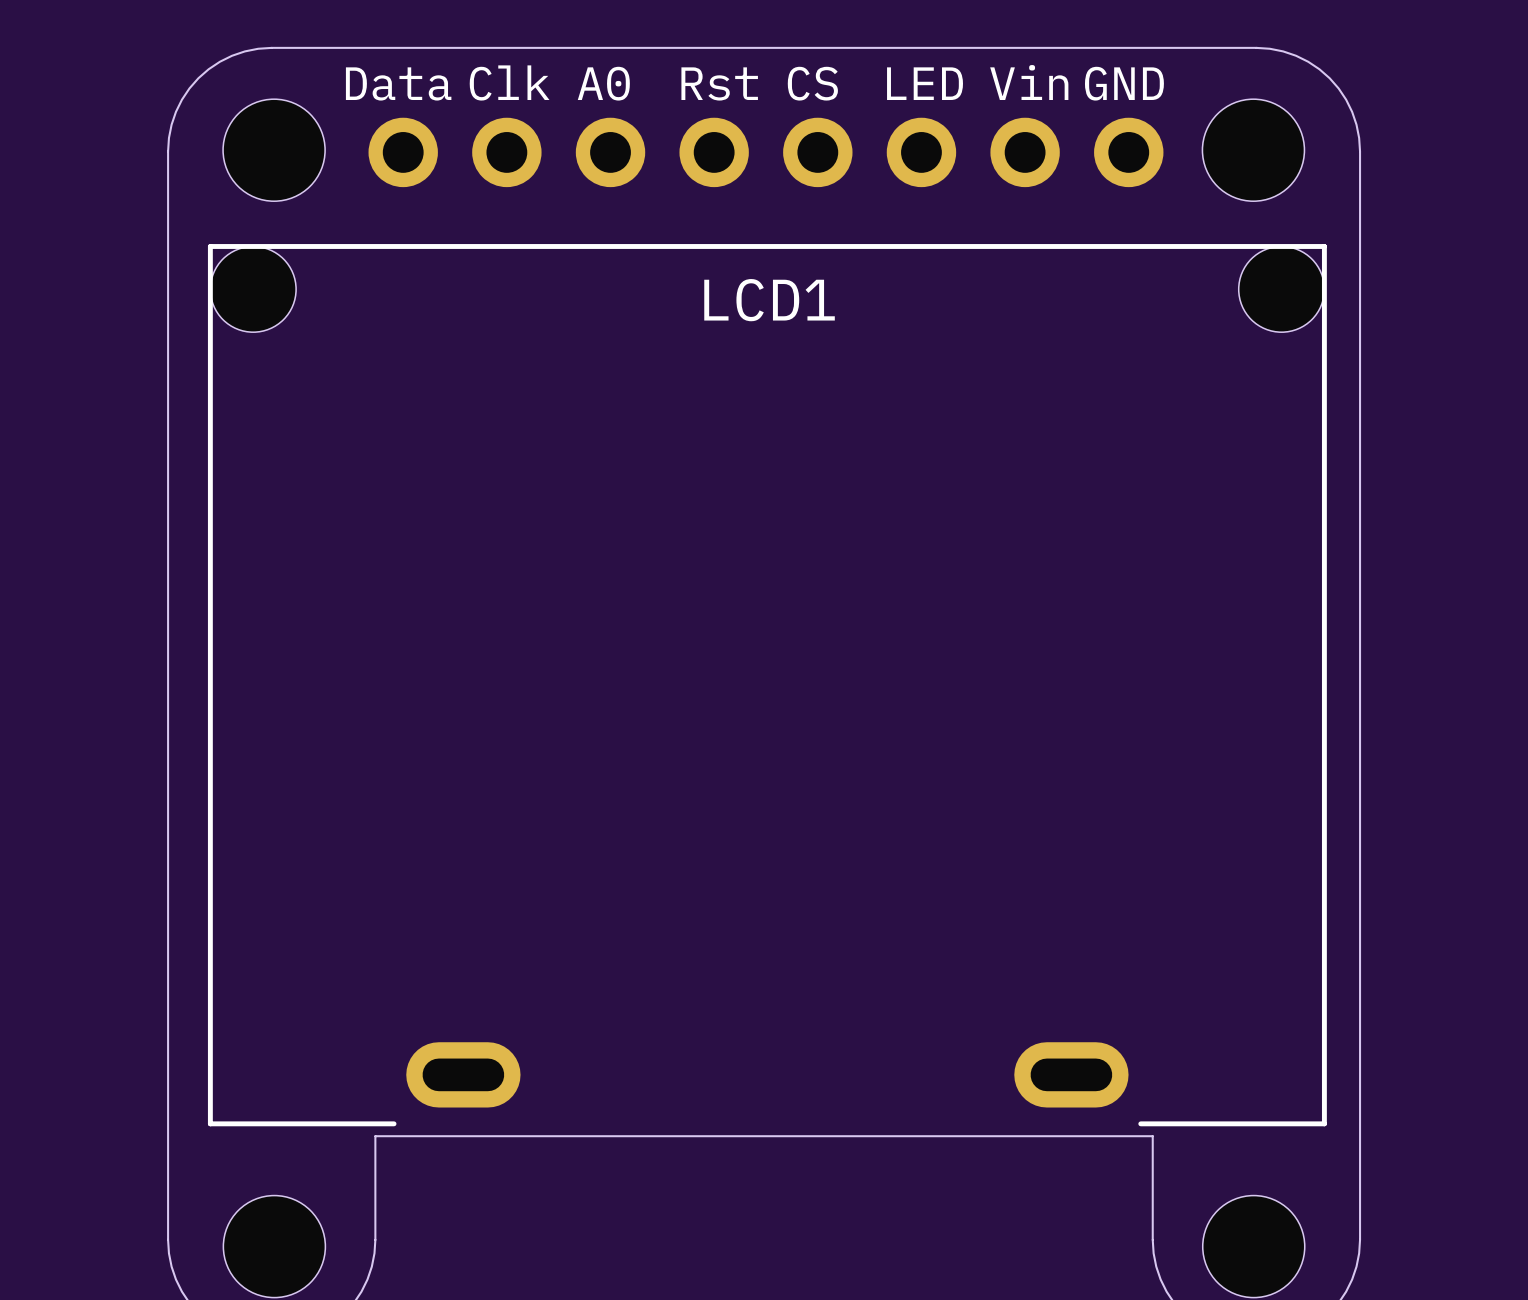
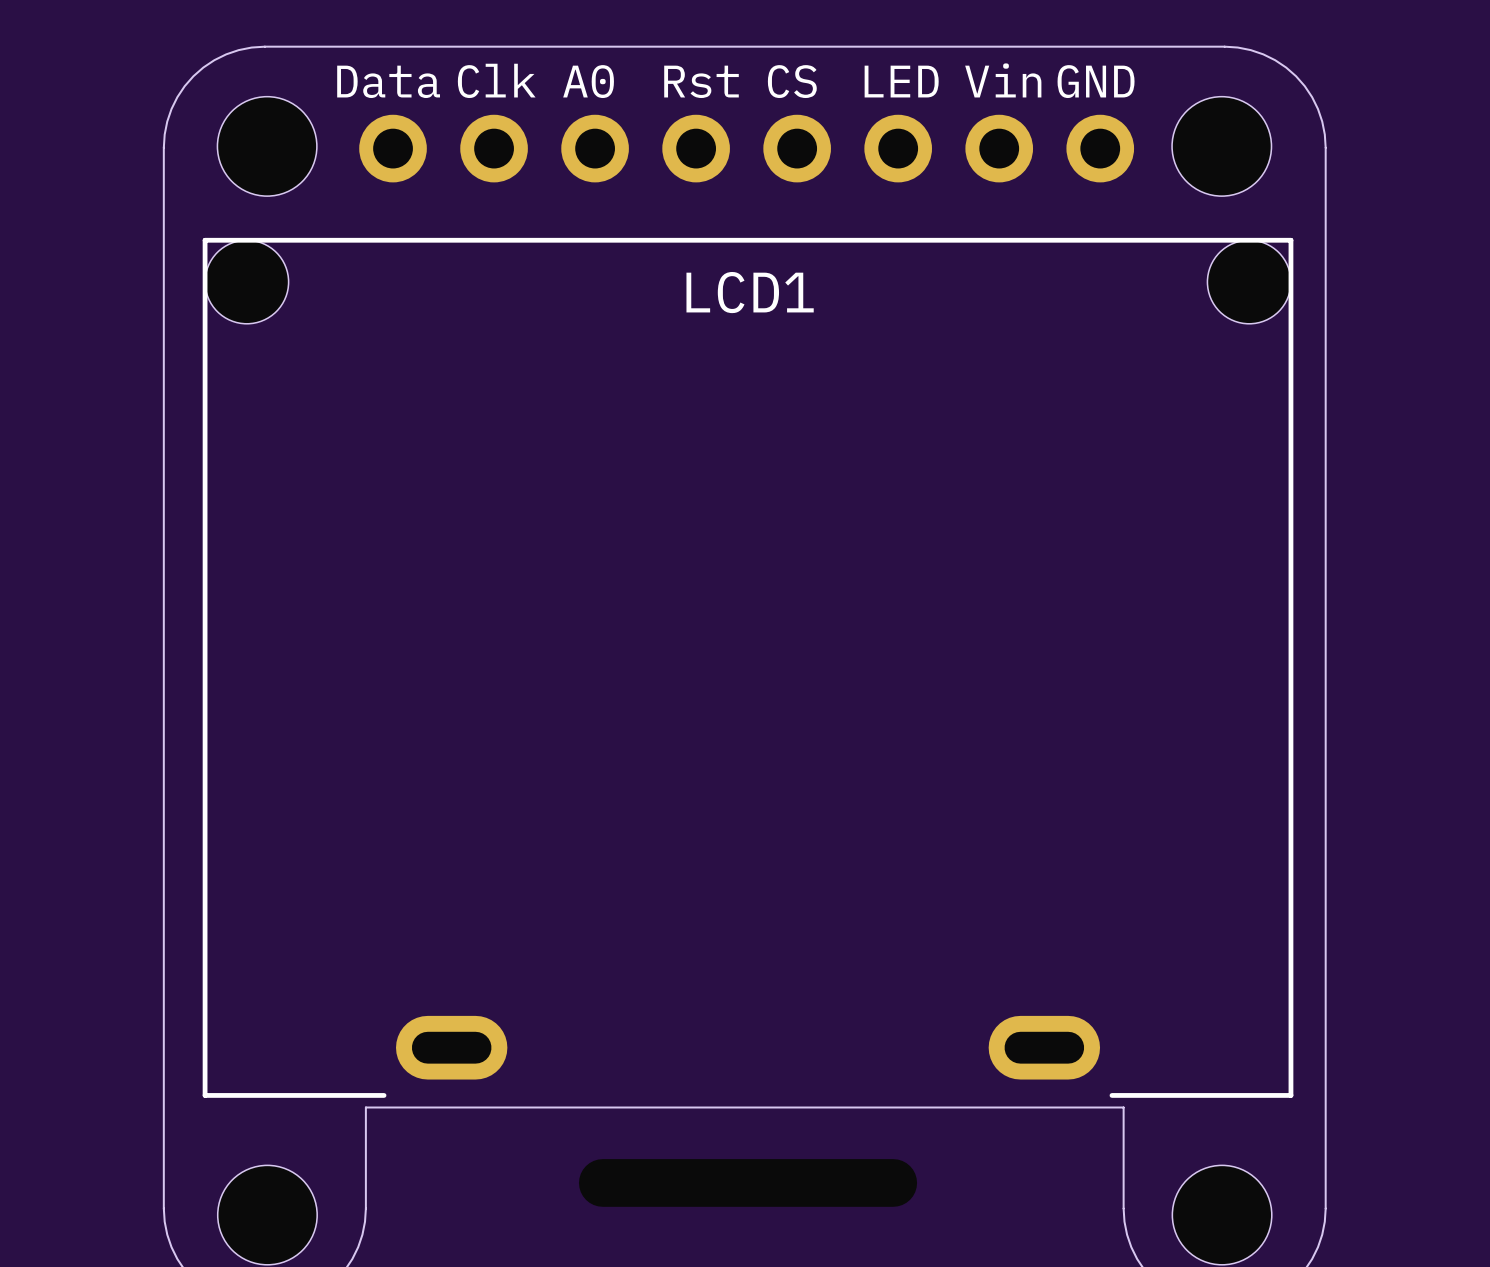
LCD1 footprint: [207, 244, 1327, 1127] -> [202, 237, 1294, 1207]

